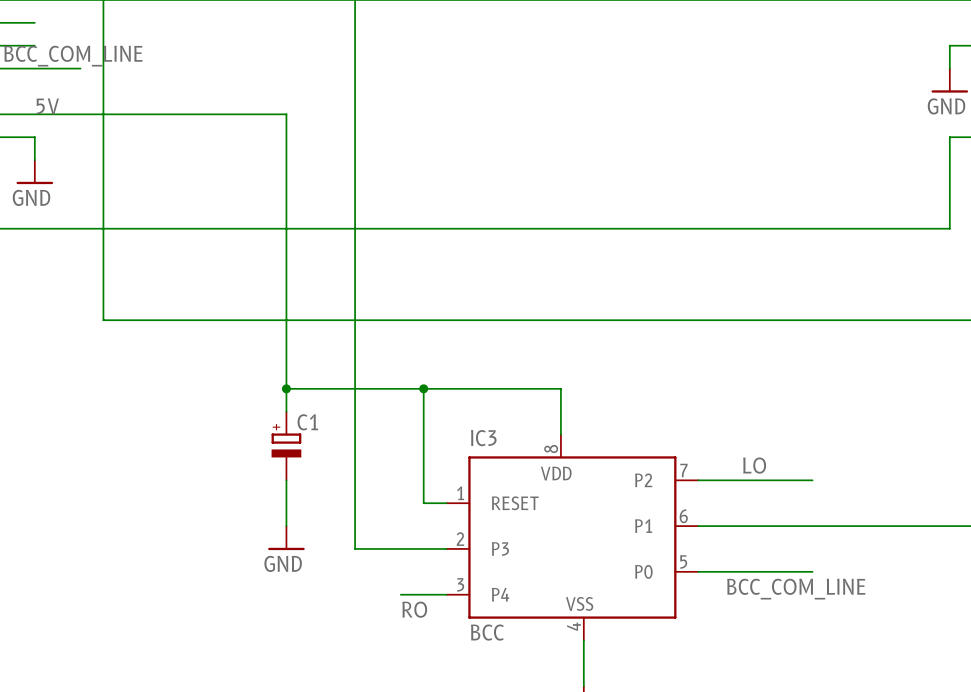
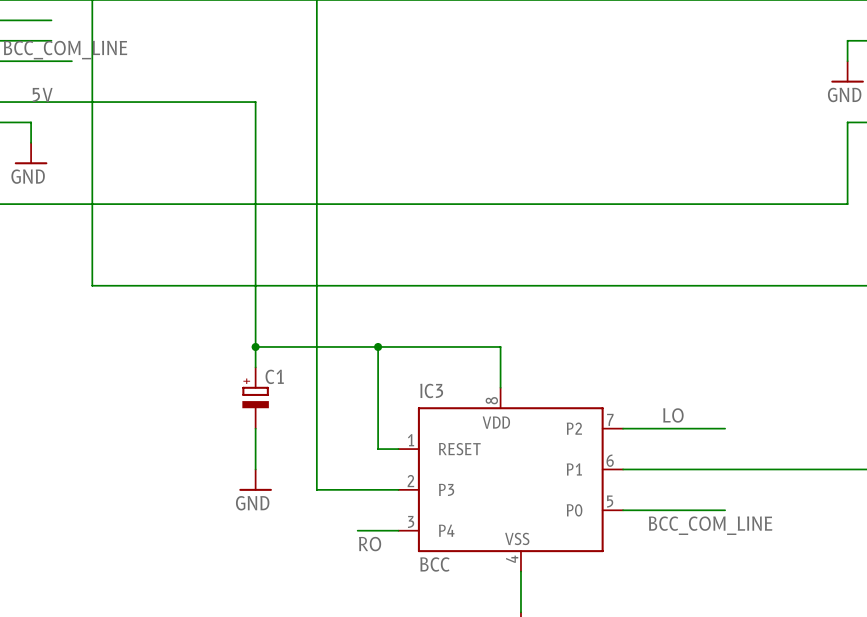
wire: none -> (31, 20) (51, 20)
wire: none -> (31, 40) (51, 40)

